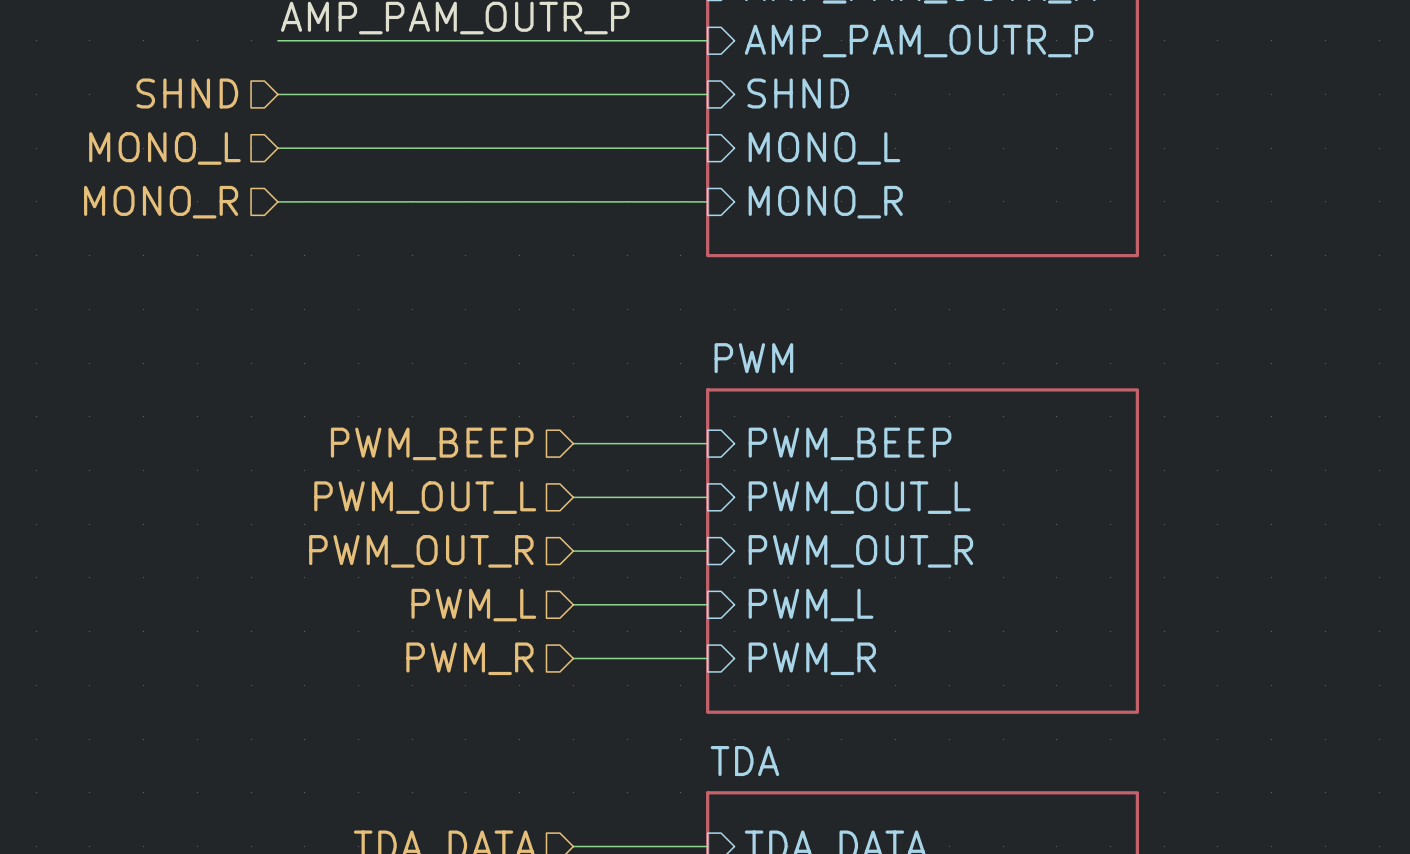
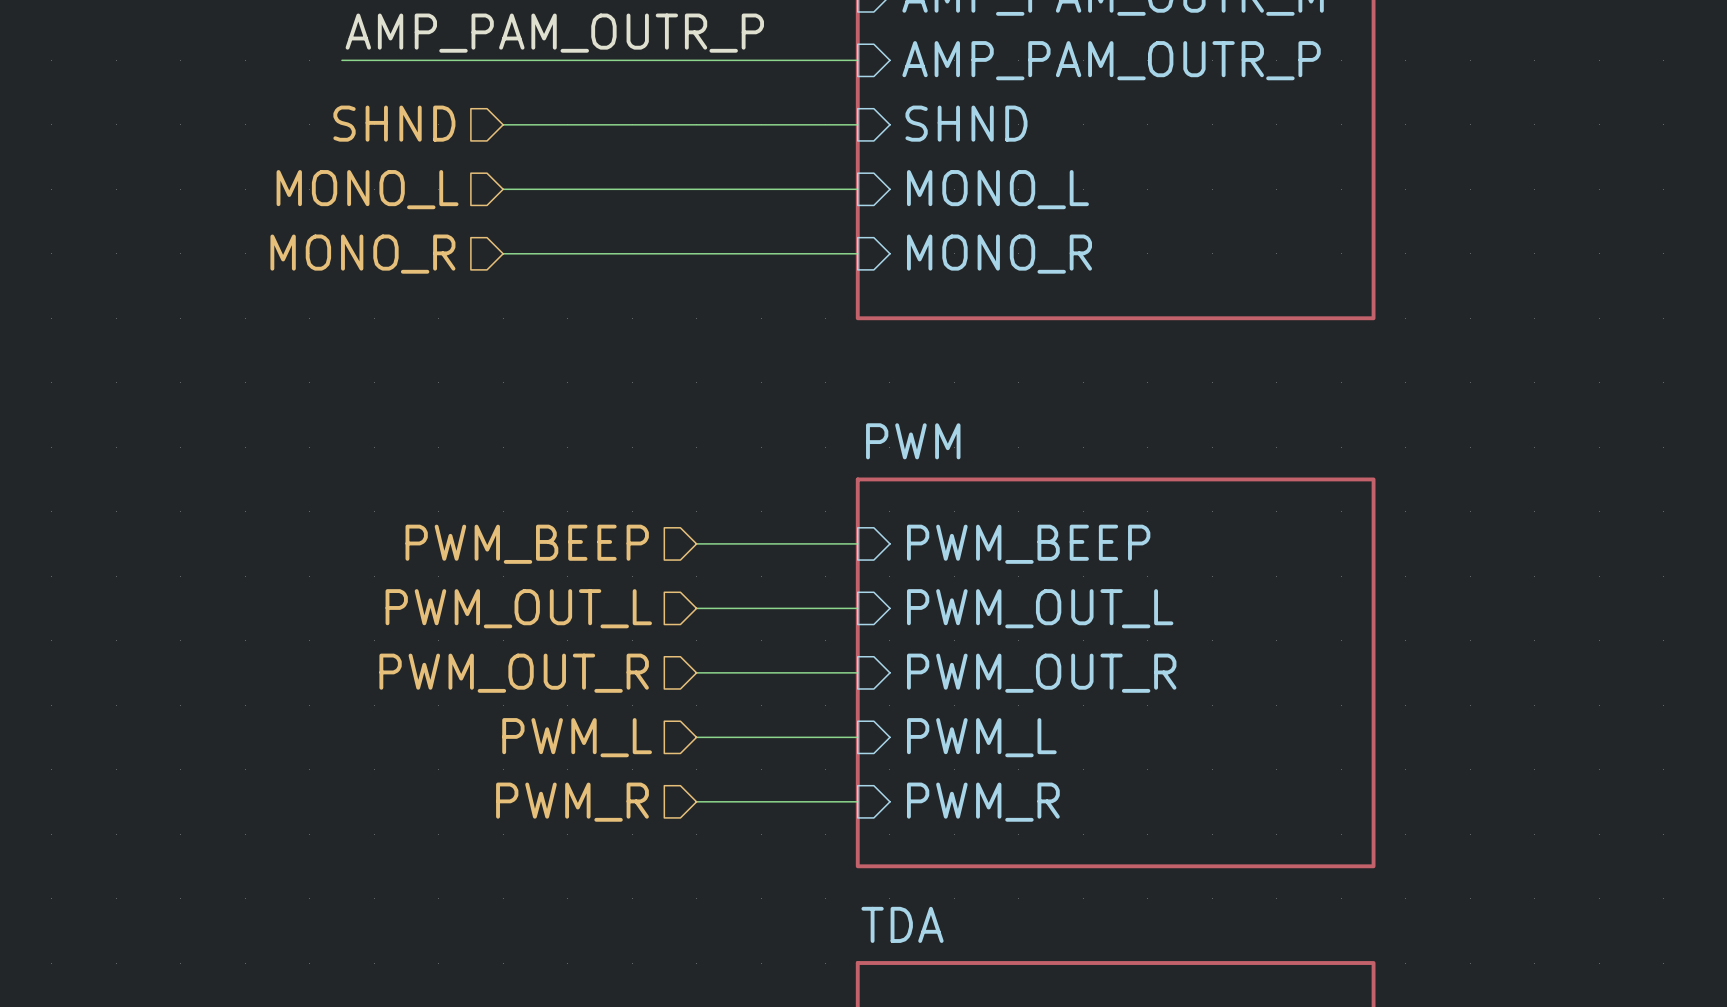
hierarchical label position: SHND (187, 93) -> SHND (394, 123)
wire: (277, 94) (412, 94) -> none
hierarchical label position: MONO_L (164, 148) -> MONO_L (367, 189)
wire: (277, 148) (412, 148) -> none
wire: (277, 201) (412, 201) -> none
hierarchical label position: MONO_R (161, 202) -> MONO_R (362, 254)

